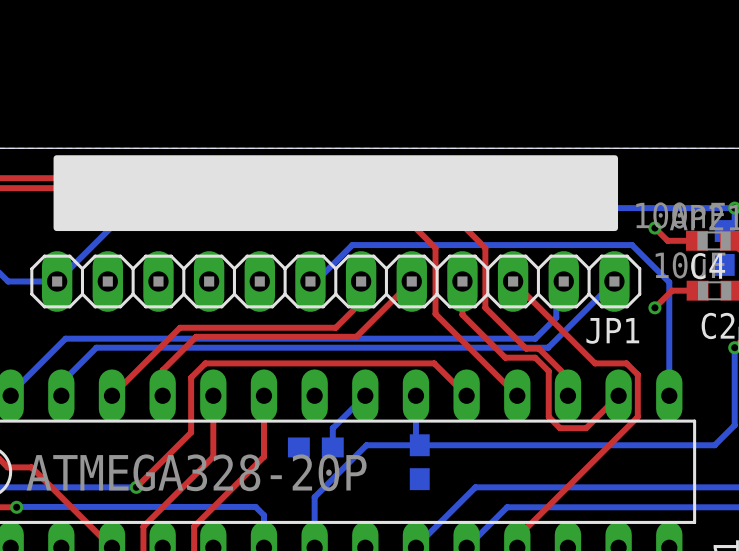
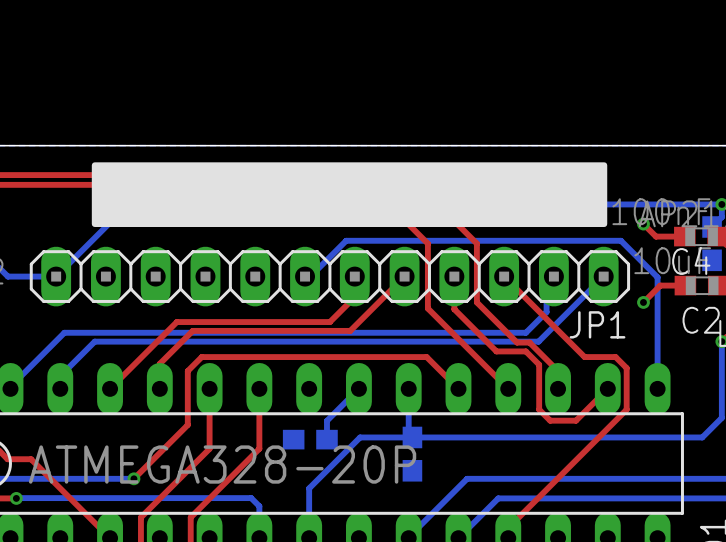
drawing: [53, 155, 619, 232] -> none
drawing: none -> [91, 162, 608, 227]

